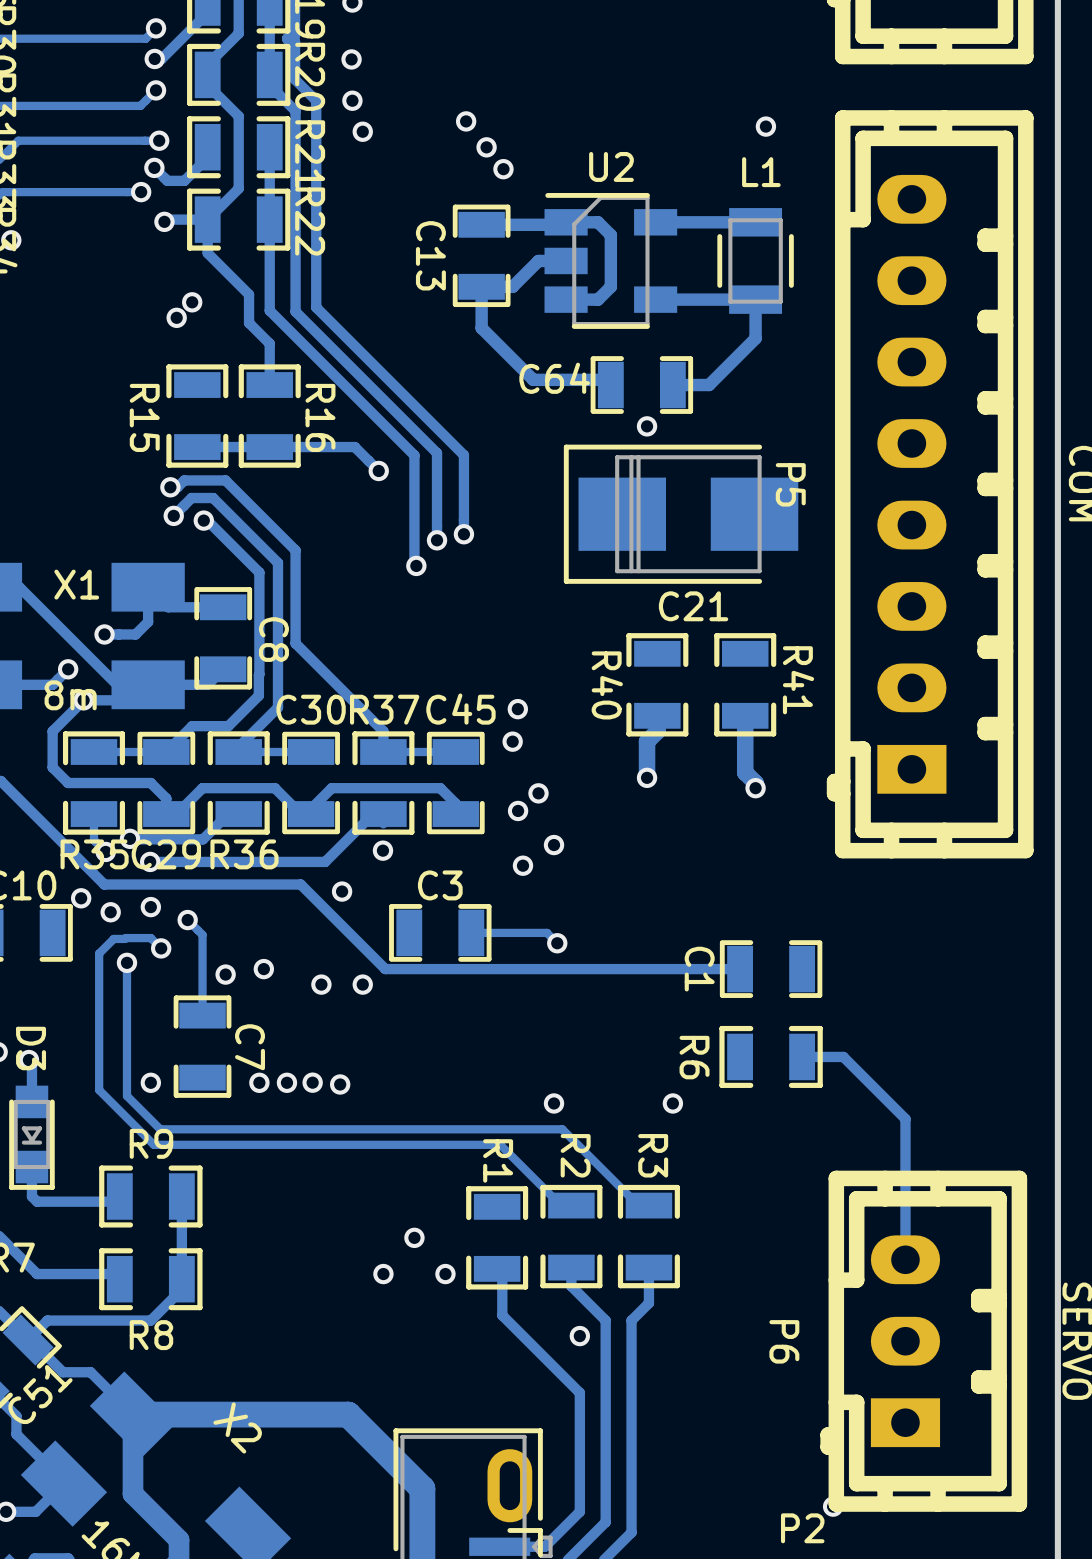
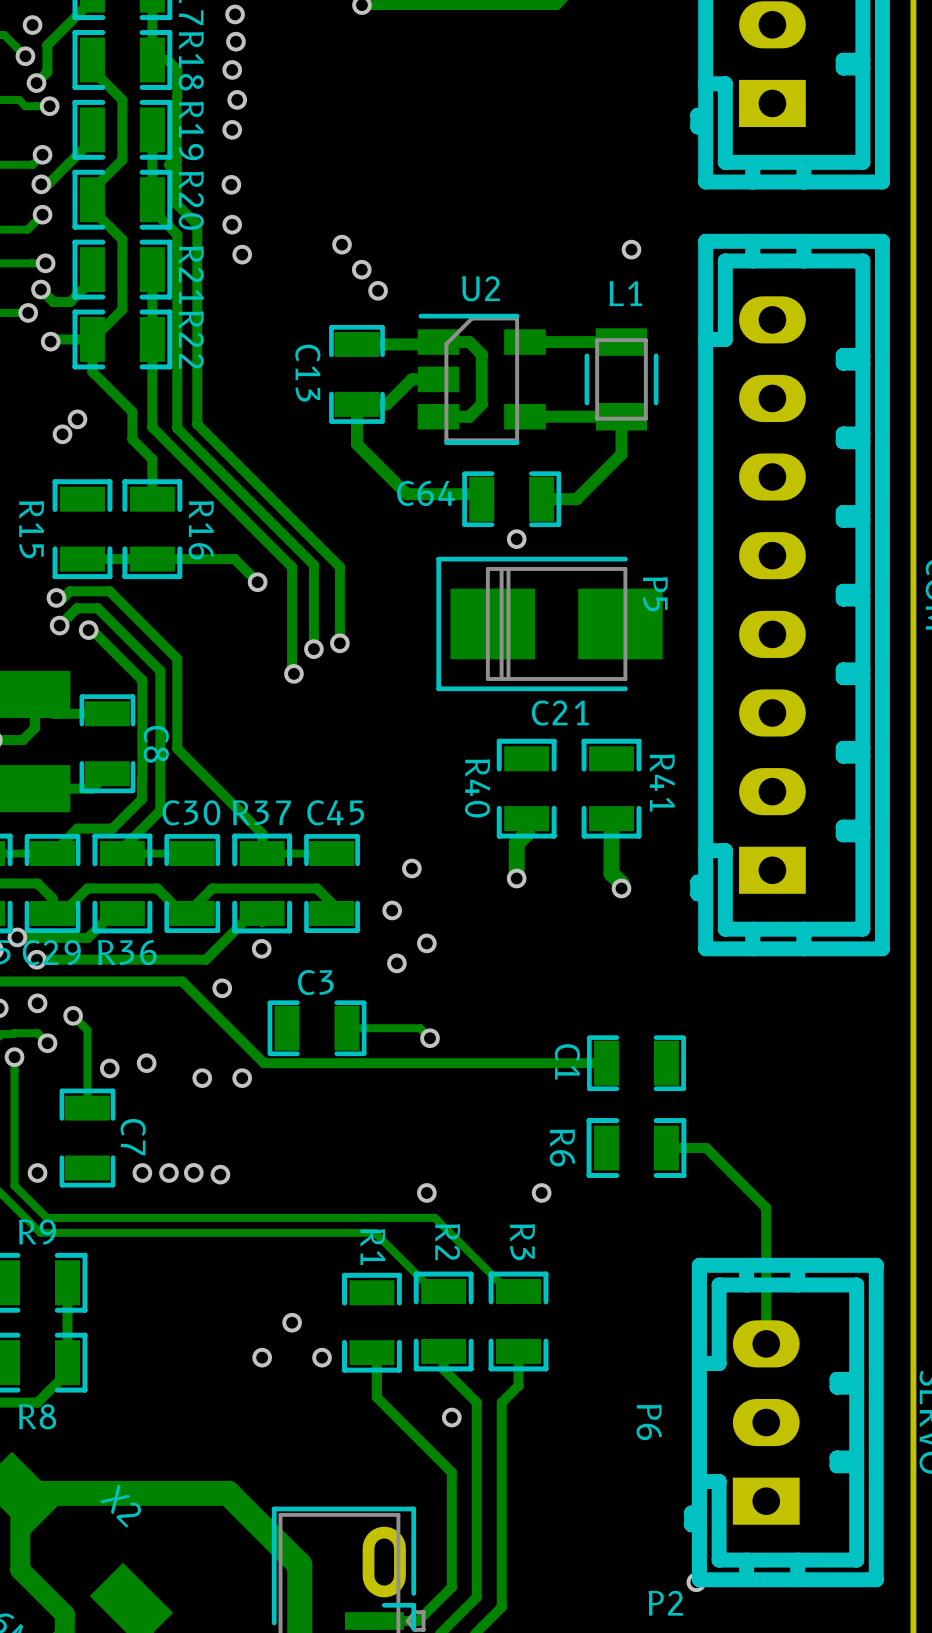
via: (517, 709) -> none
via: (512, 741) -> none
via: none -> (411, 868)
via: (538, 793) -> none

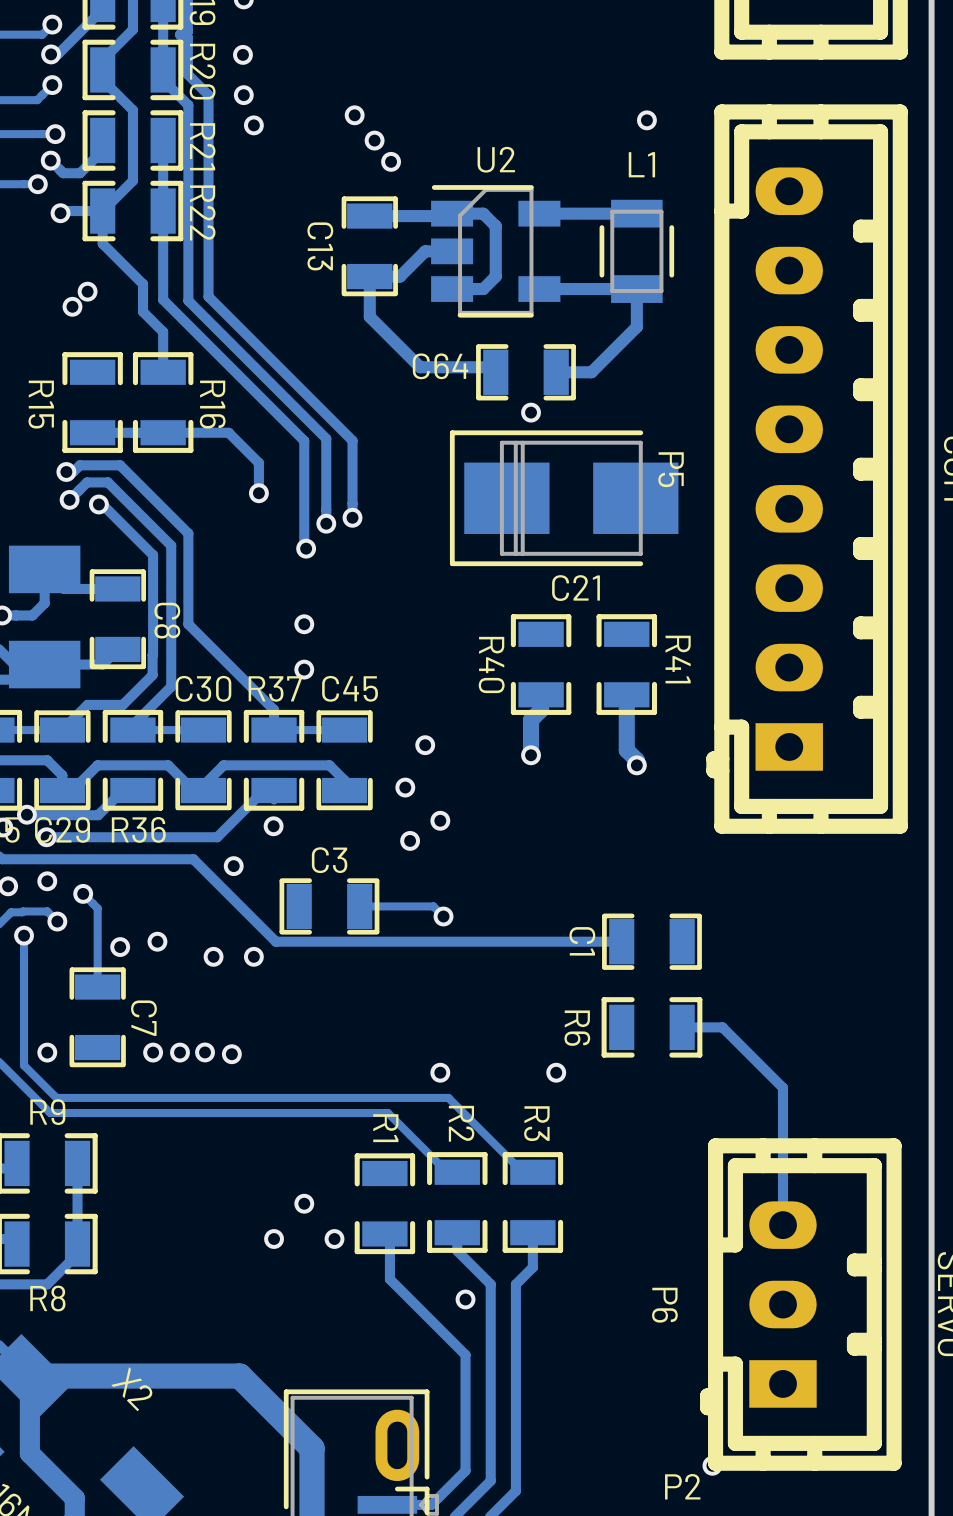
track: (217, 559) (234, 559) (257, 582) -> (228, 432) (258, 463) (258, 493)
via position: (257, 582) -> (258, 493)
via: none -> (304, 624)
via: none -> (304, 669)

